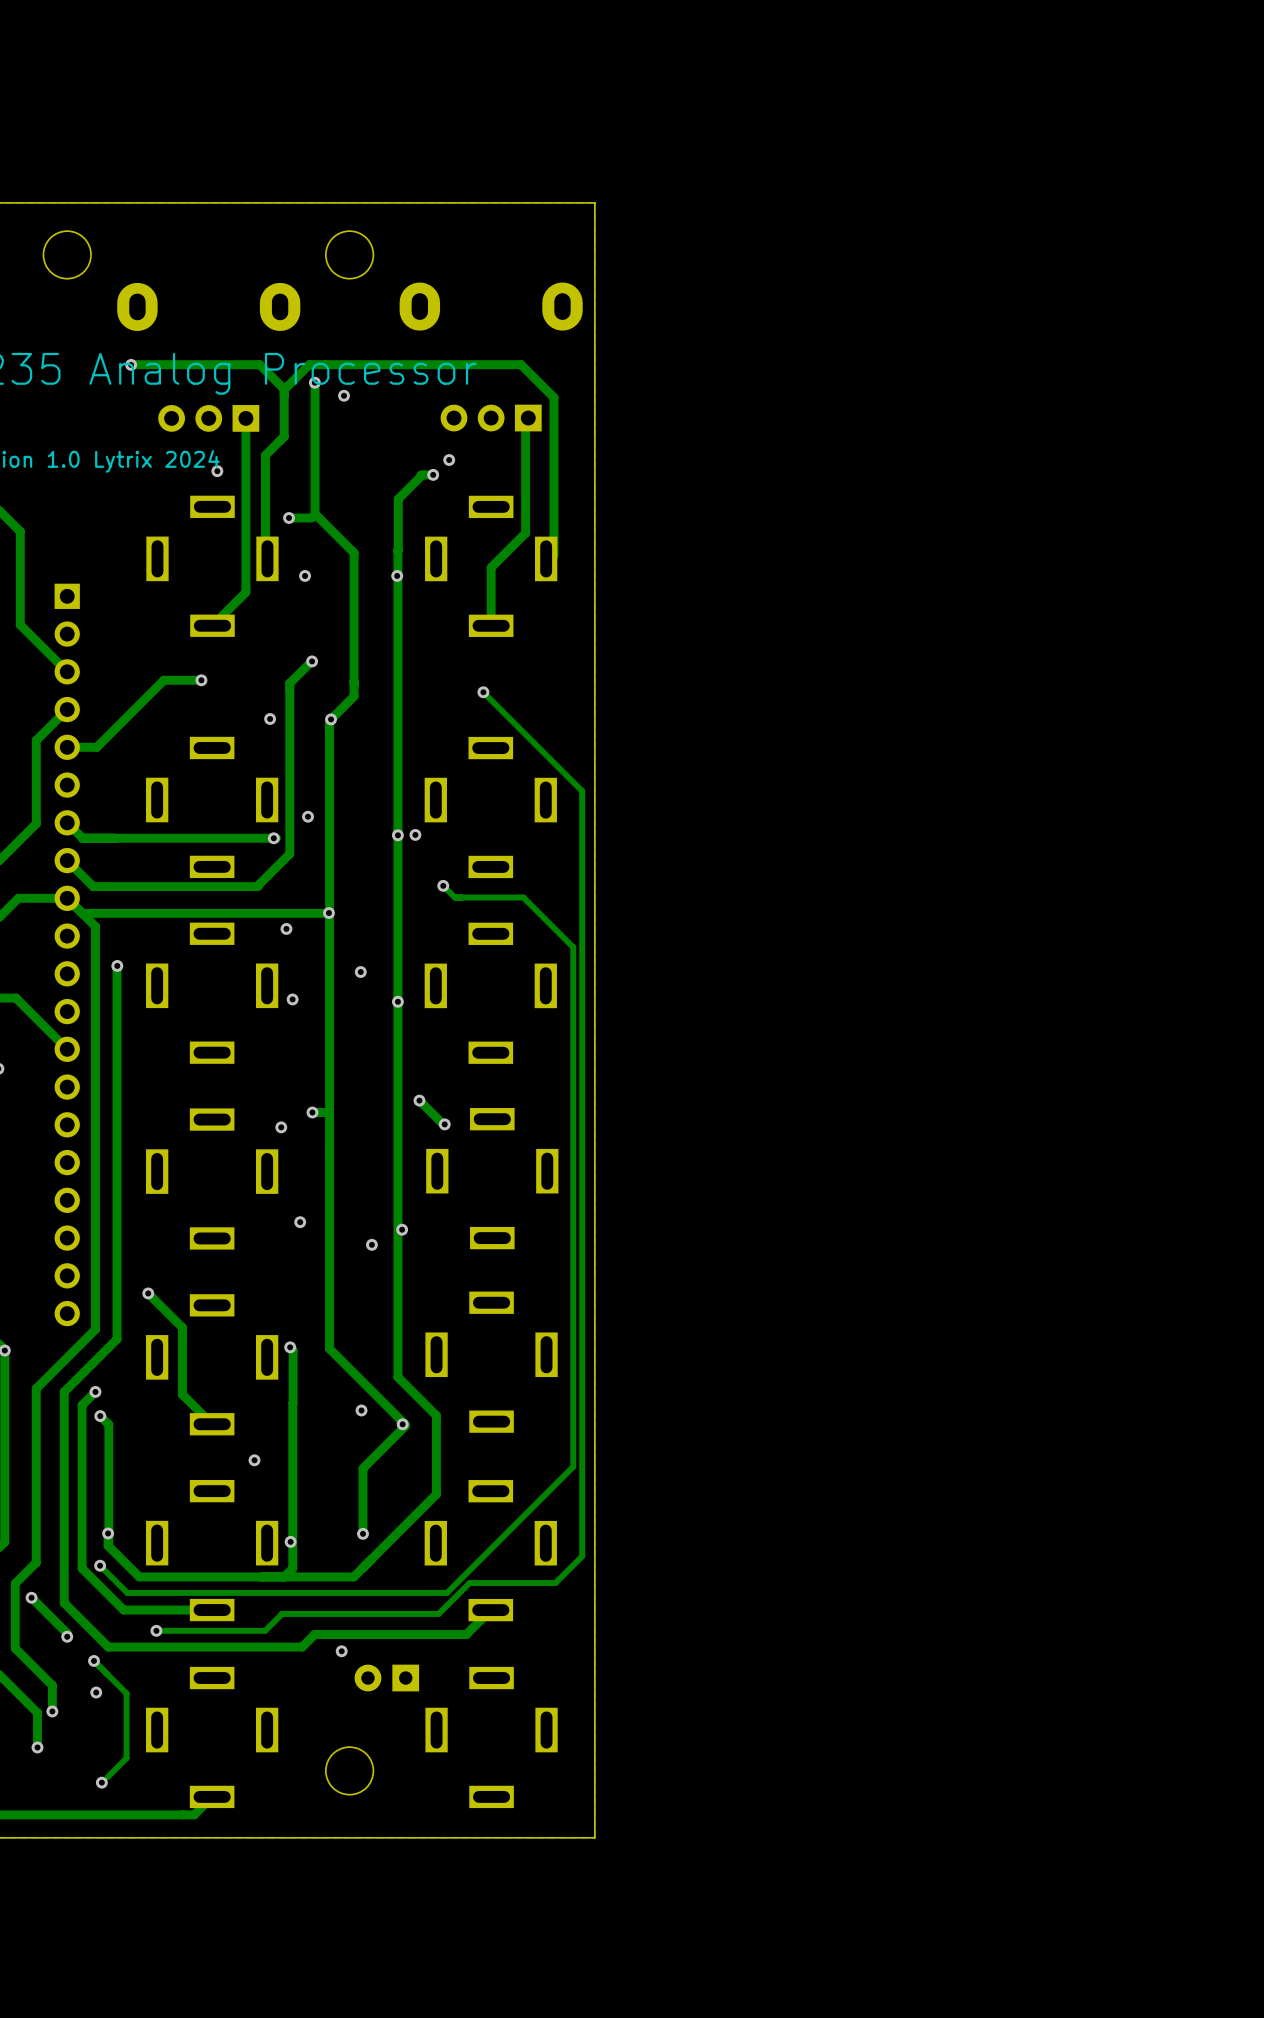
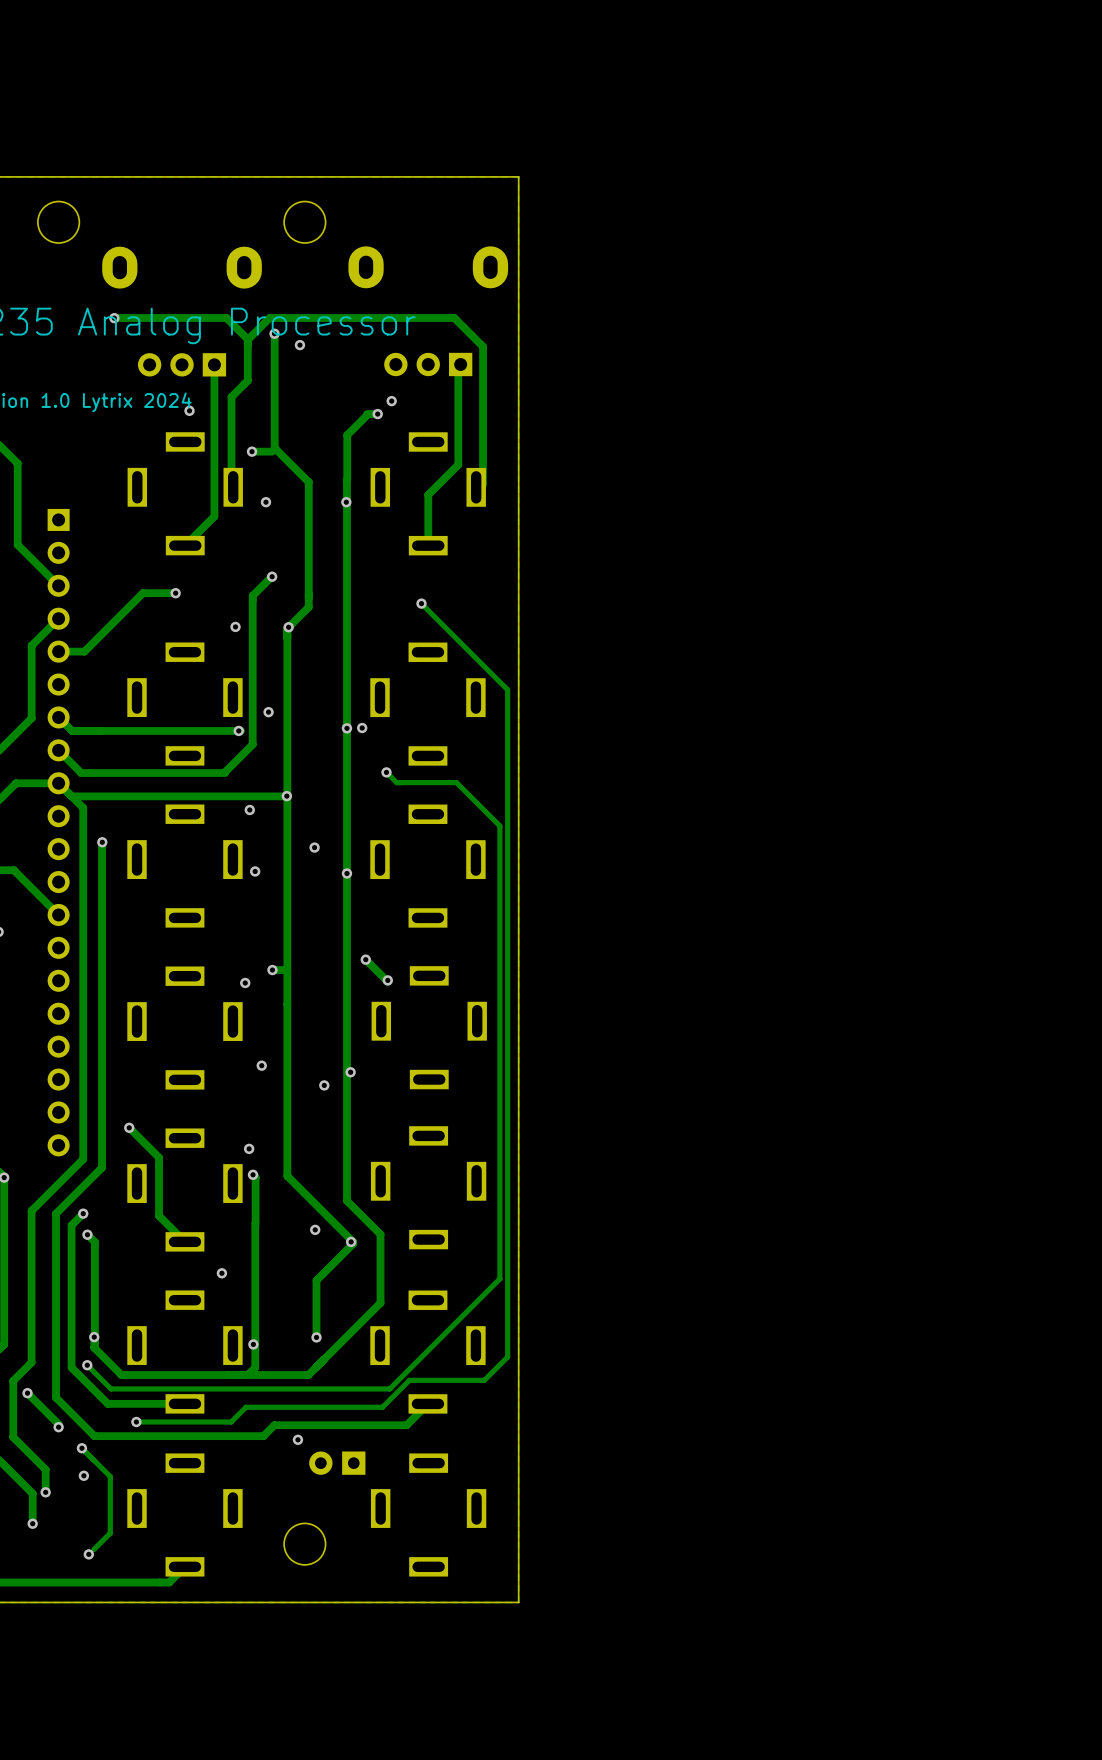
via: none -> (249, 1148)

